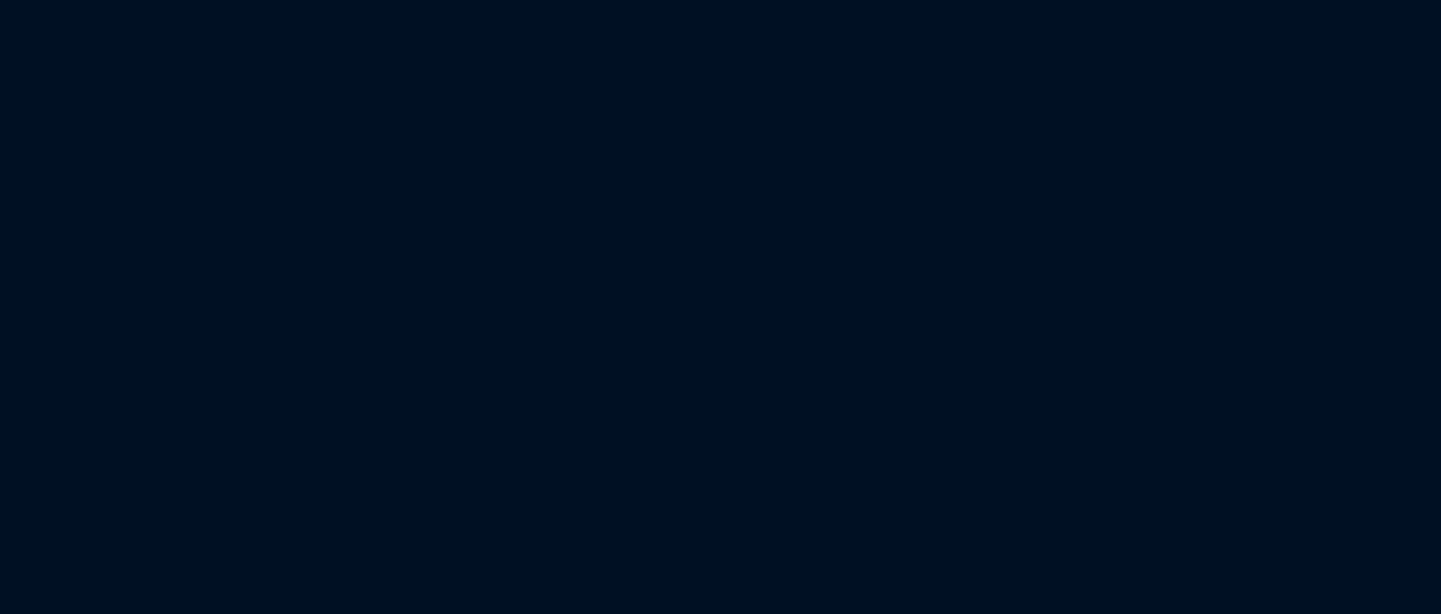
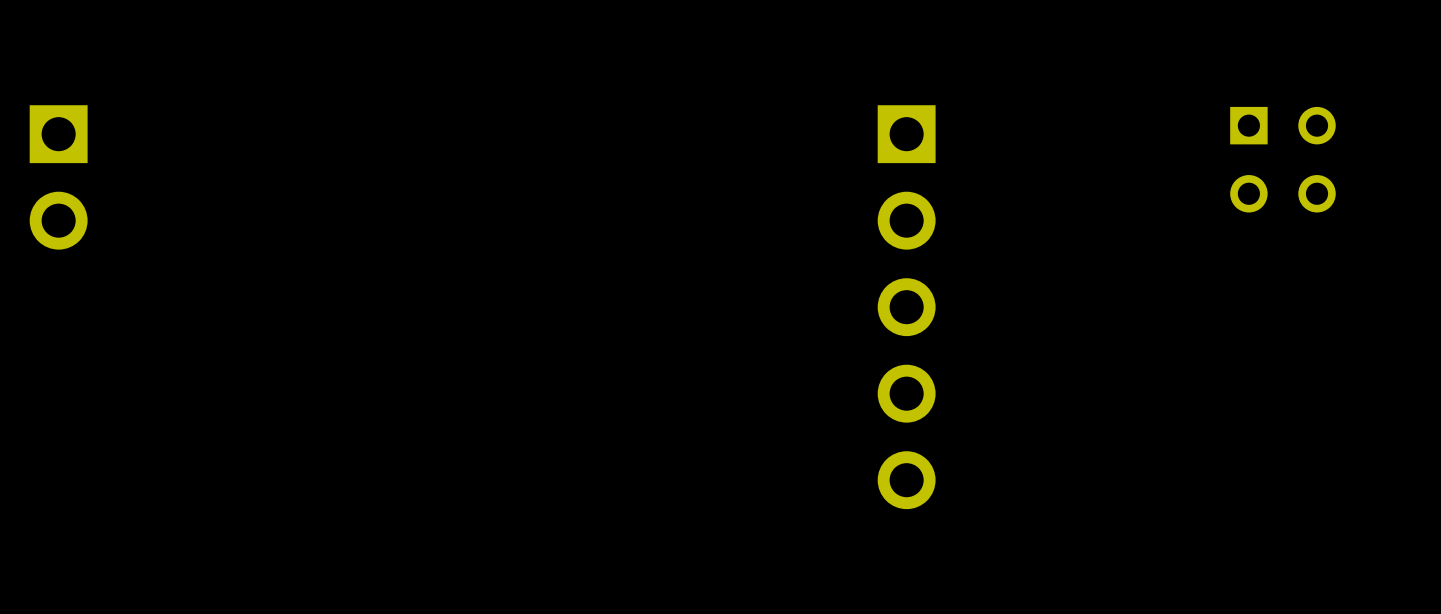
part: none -> (1282, 159)
part: none -> (58, 177)
part: none -> (906, 307)

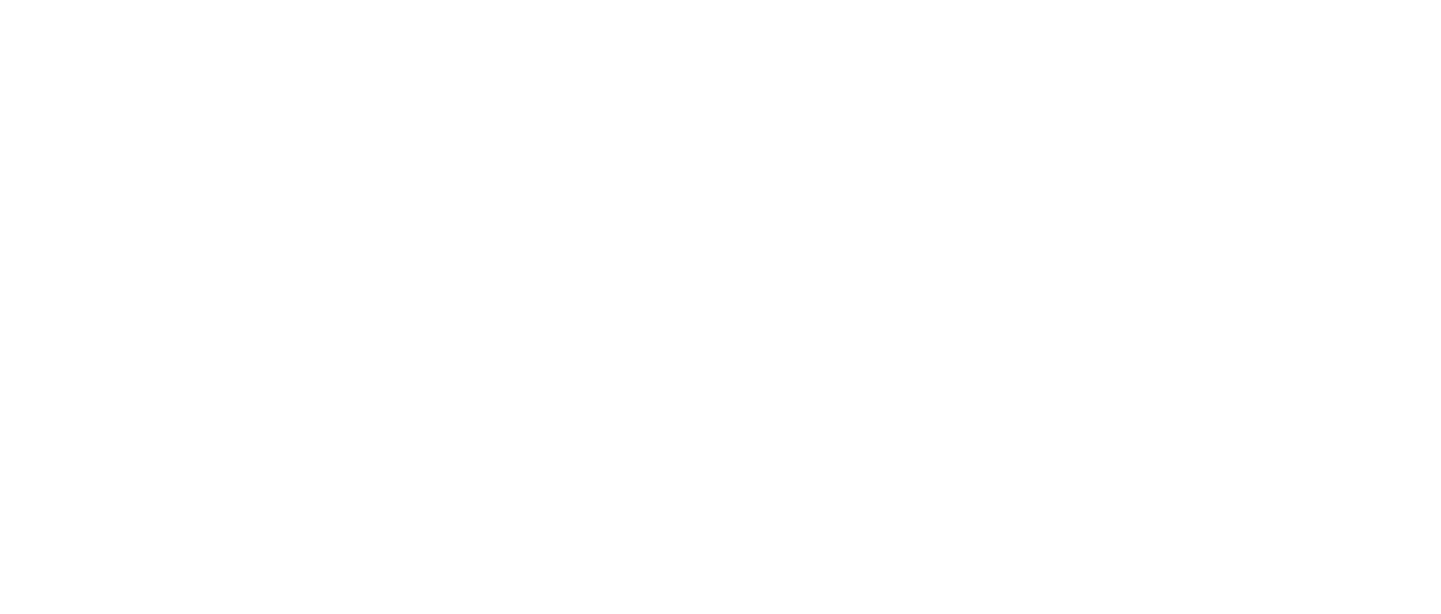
part: (1282, 159) -> none
part: (58, 177) -> none
part: (906, 307) -> none

